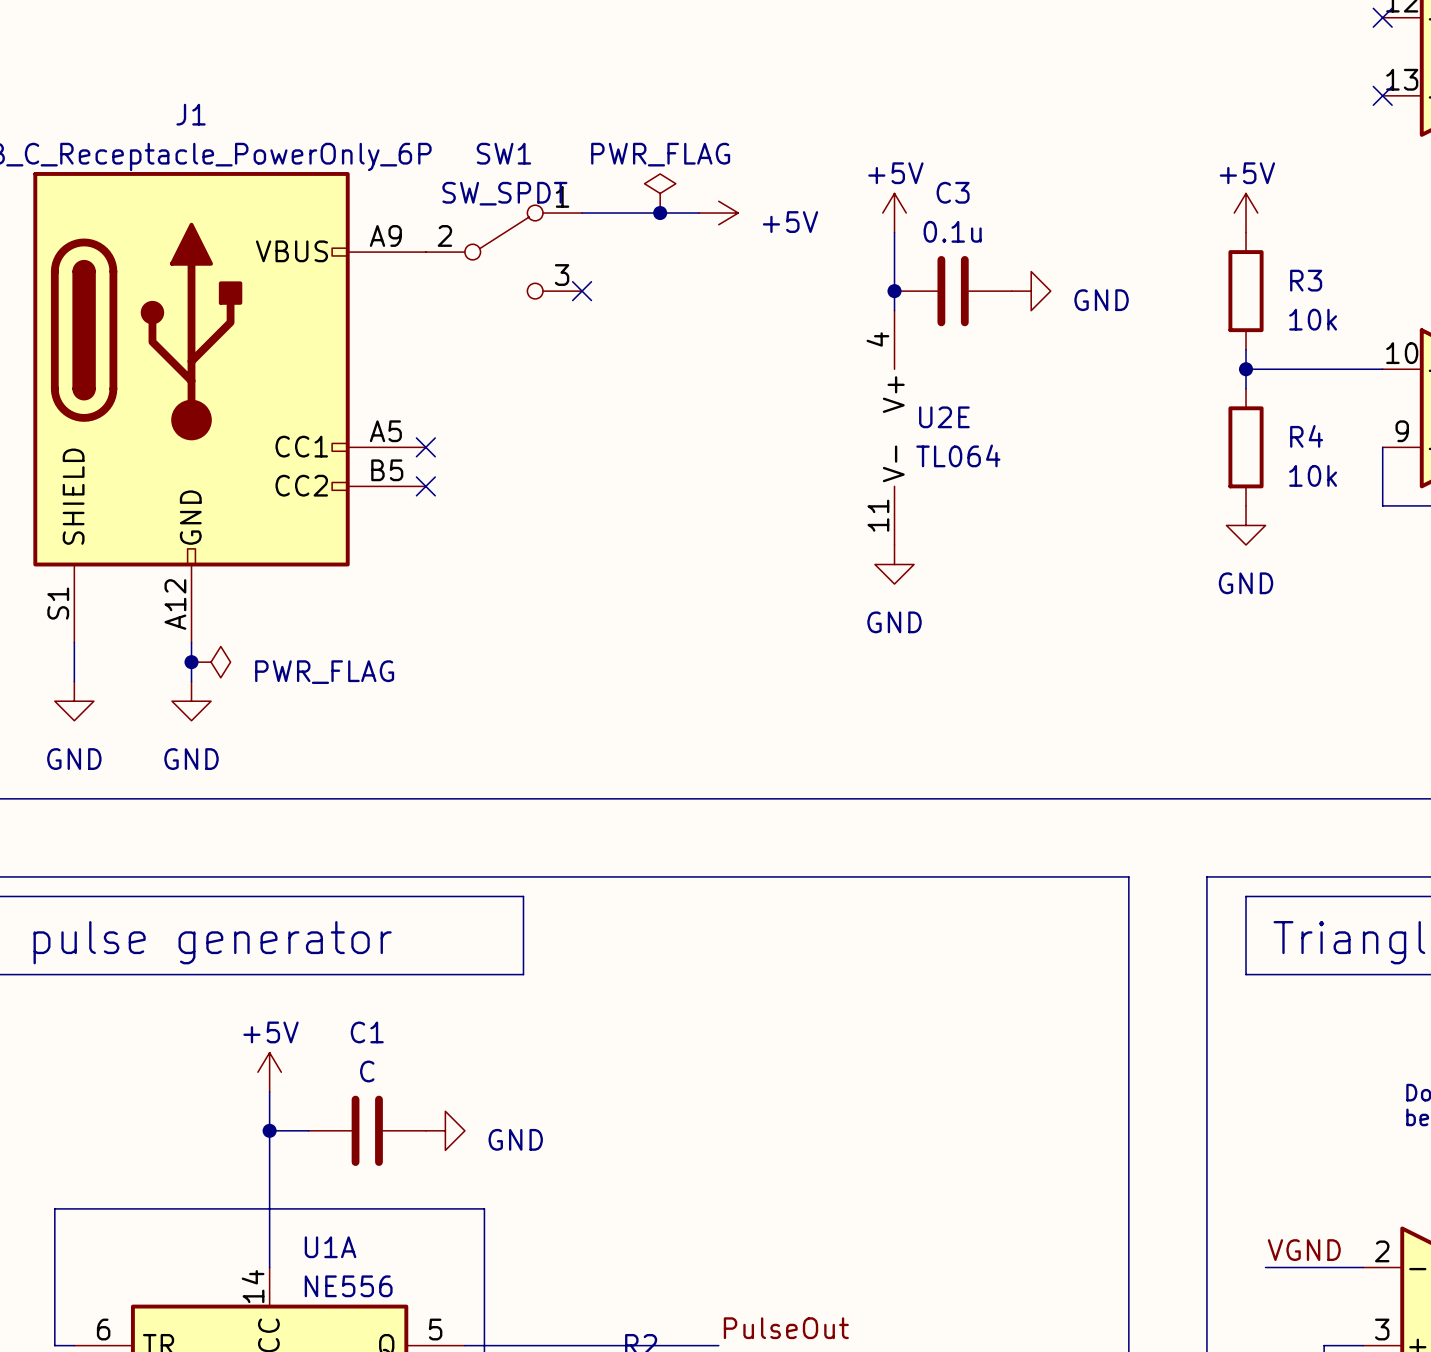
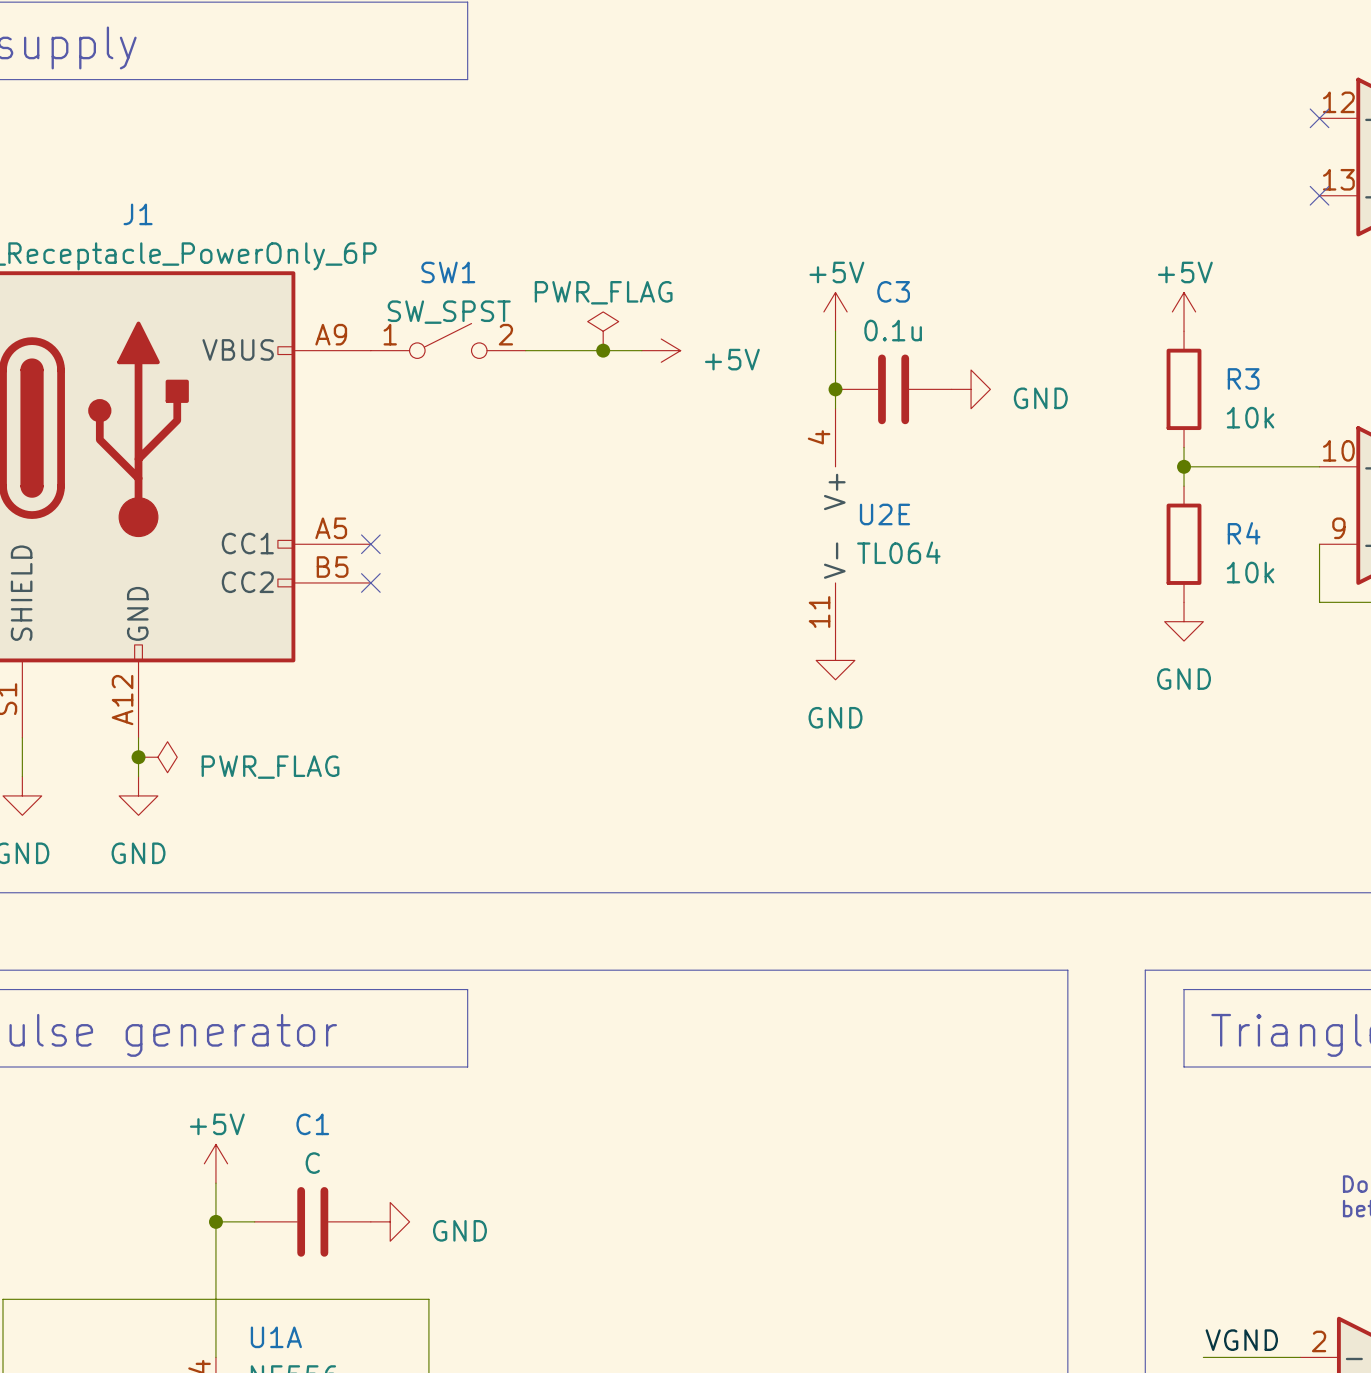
SW1 value: SW_SPDT (504, 193) -> SW_SPST (449, 312)
power symbol position: PWR_FLAG (660, 193) -> PWR_FLAG (603, 331)
SW1 symbol: [425, 205, 583, 299] -> [370, 323, 526, 359]
wire: (582, 213) (699, 213) -> (525, 350) (641, 350)
junction position: (660, 213) -> (603, 350)
power symbol position: +5V (718, 213) -> +5V (661, 350)
no-connect mark: (582, 291) -> none

